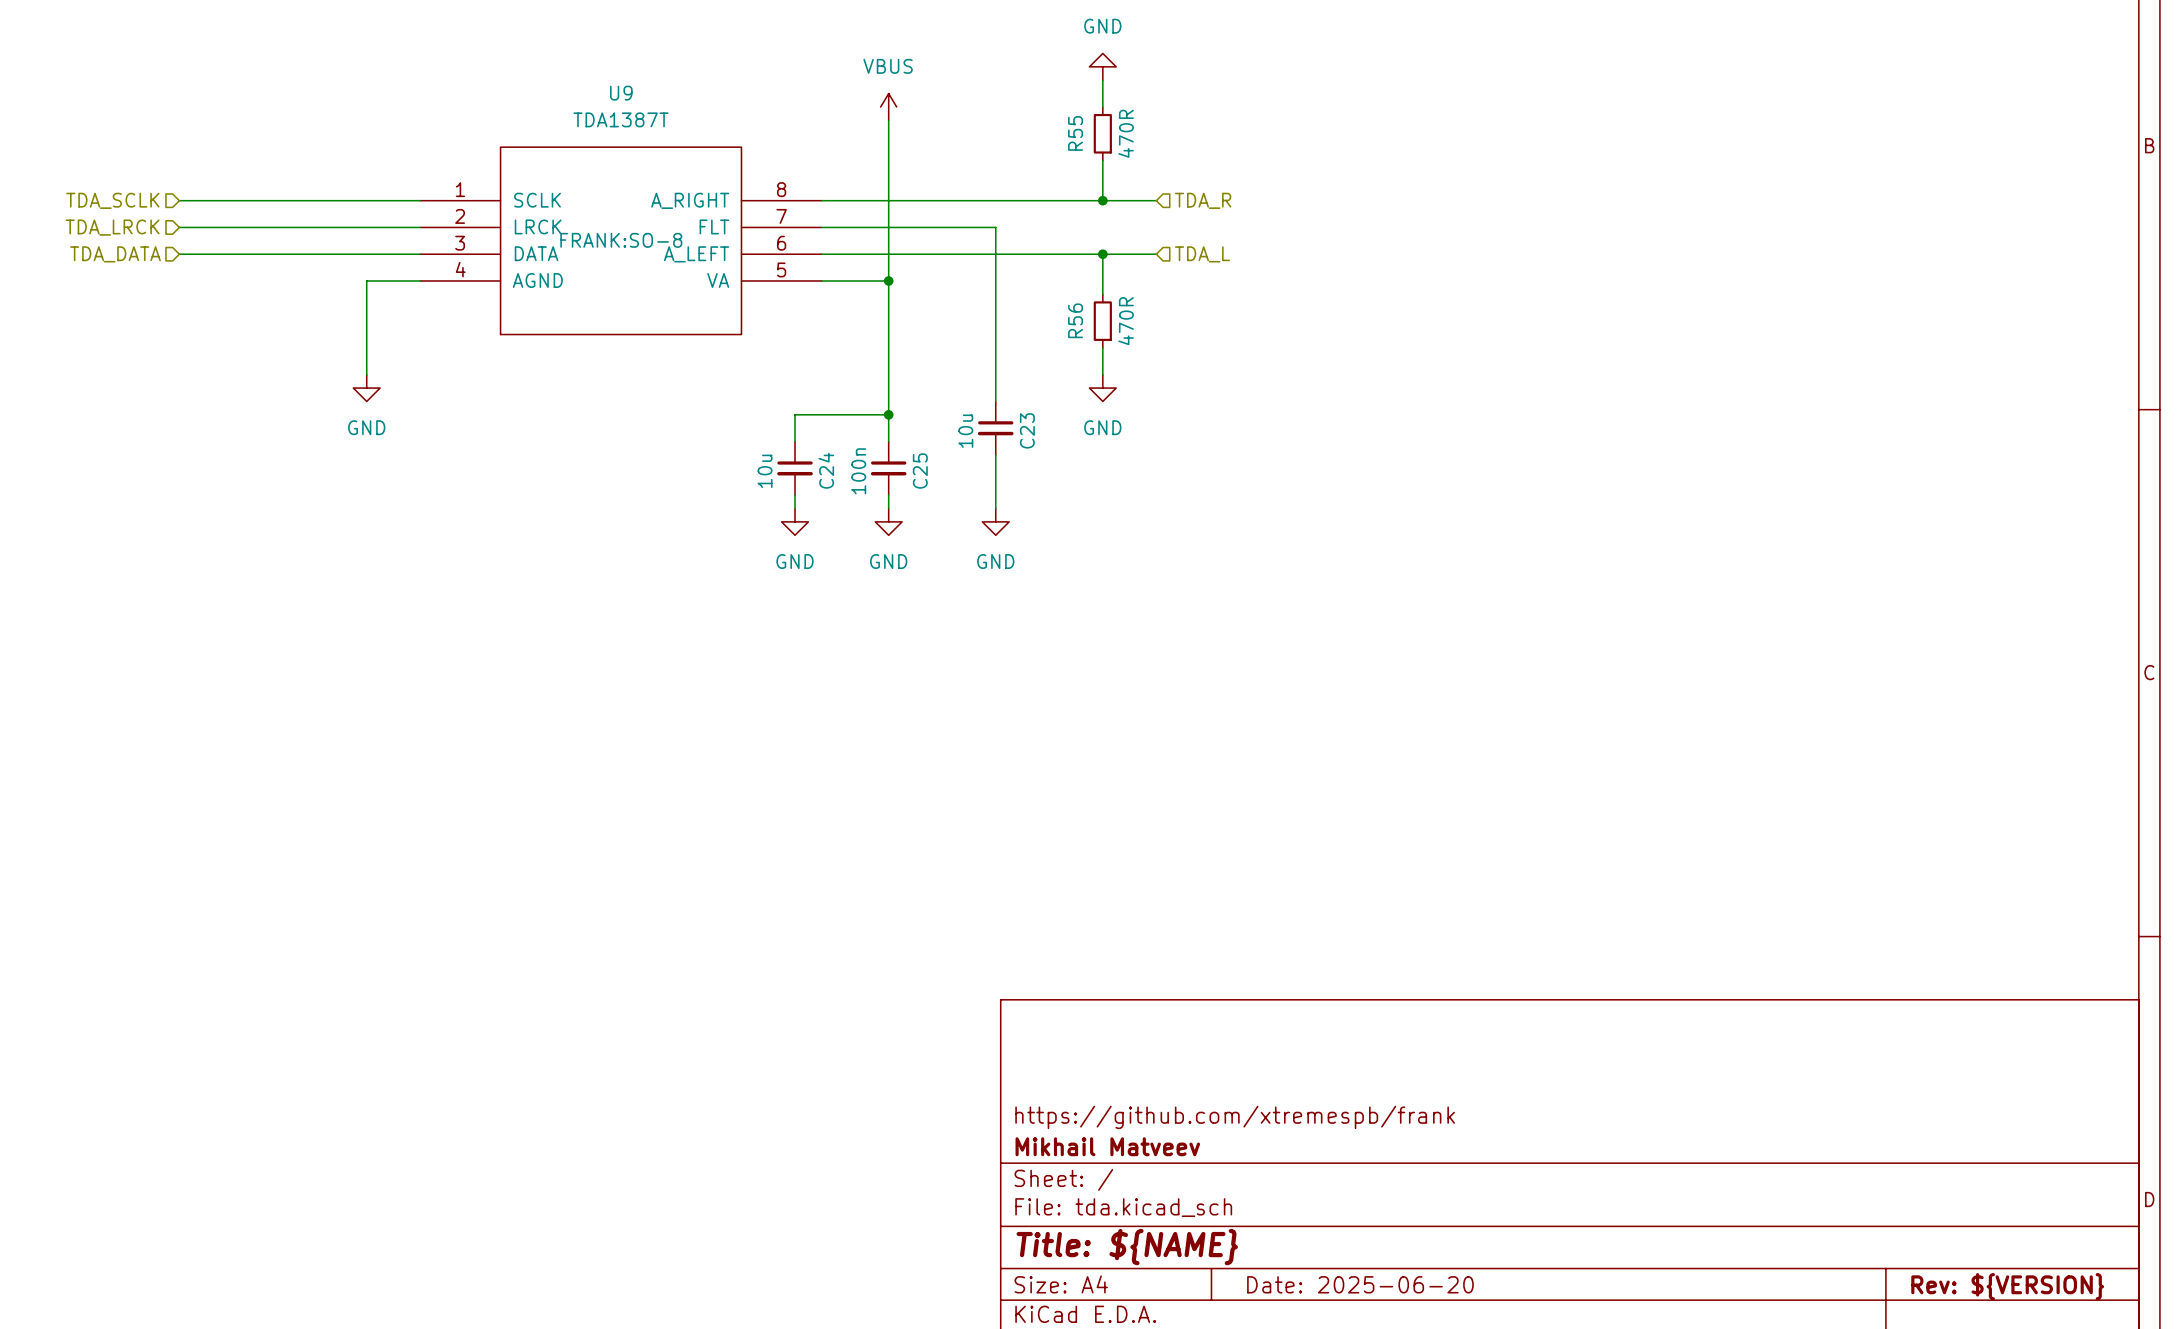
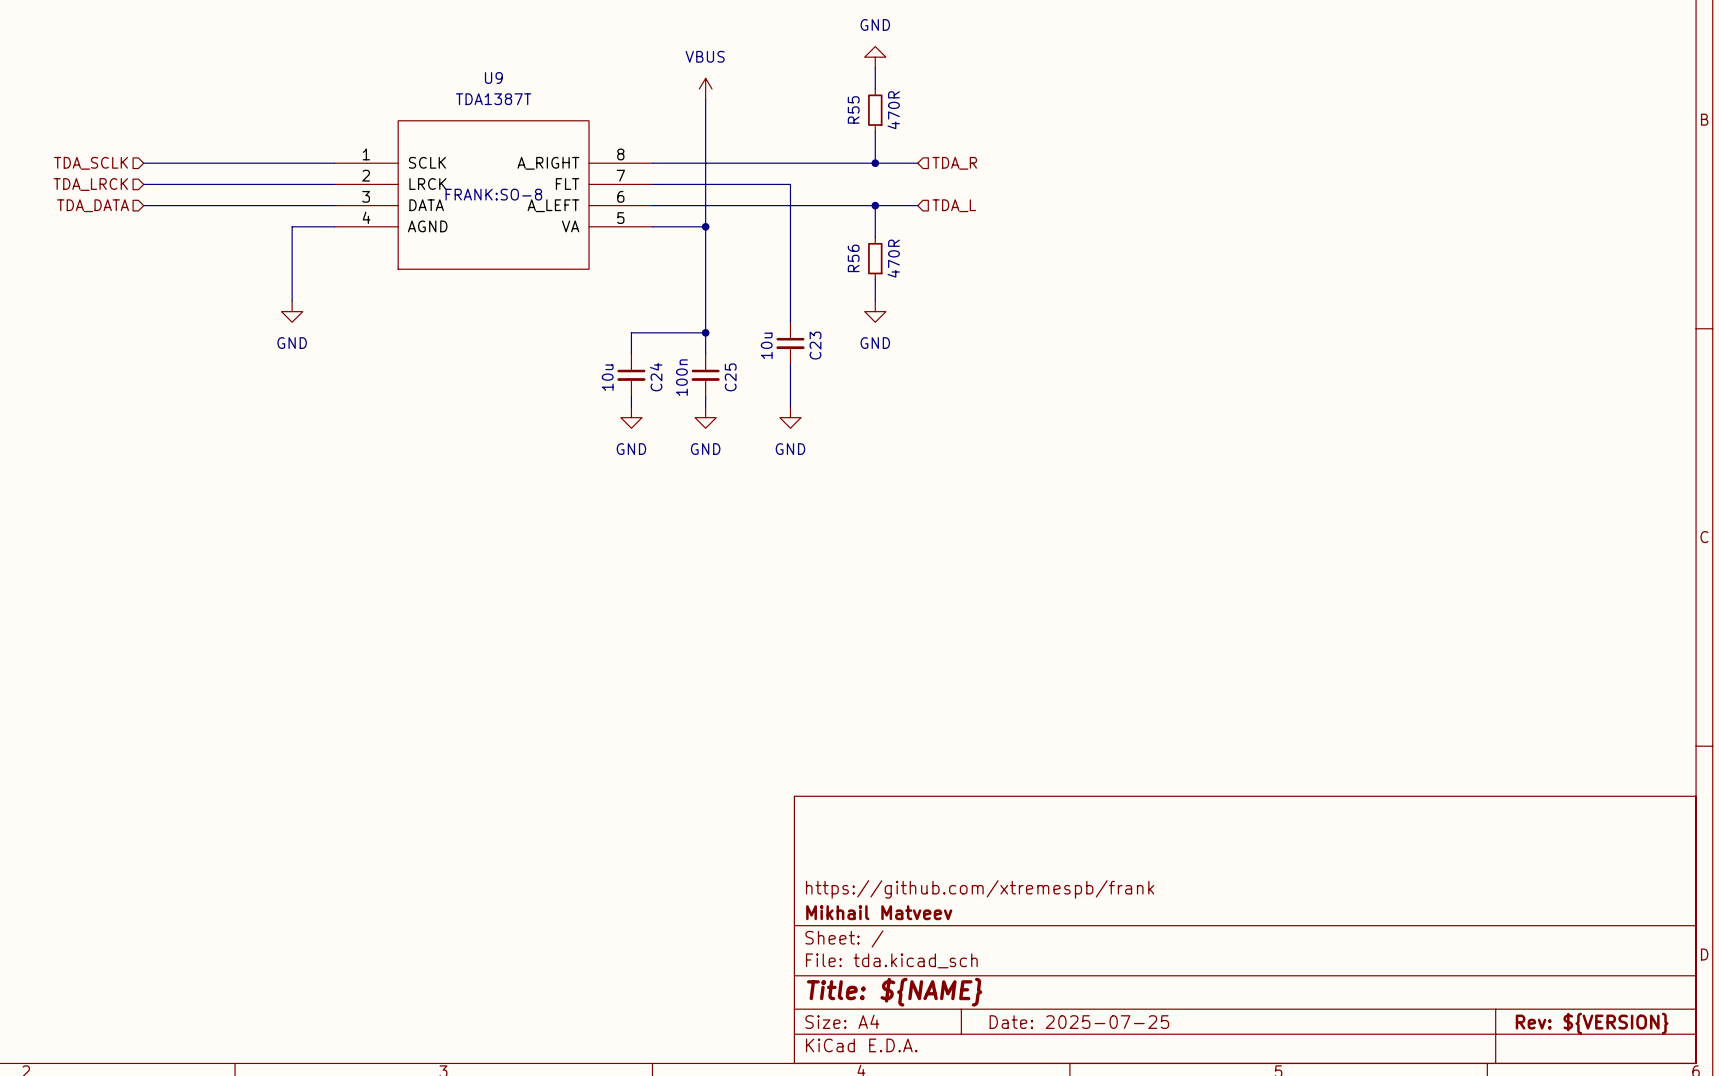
title block: Date: 2025-06-20 (1360, 1284) -> Date: 2025-07-25 (1079, 1022)

